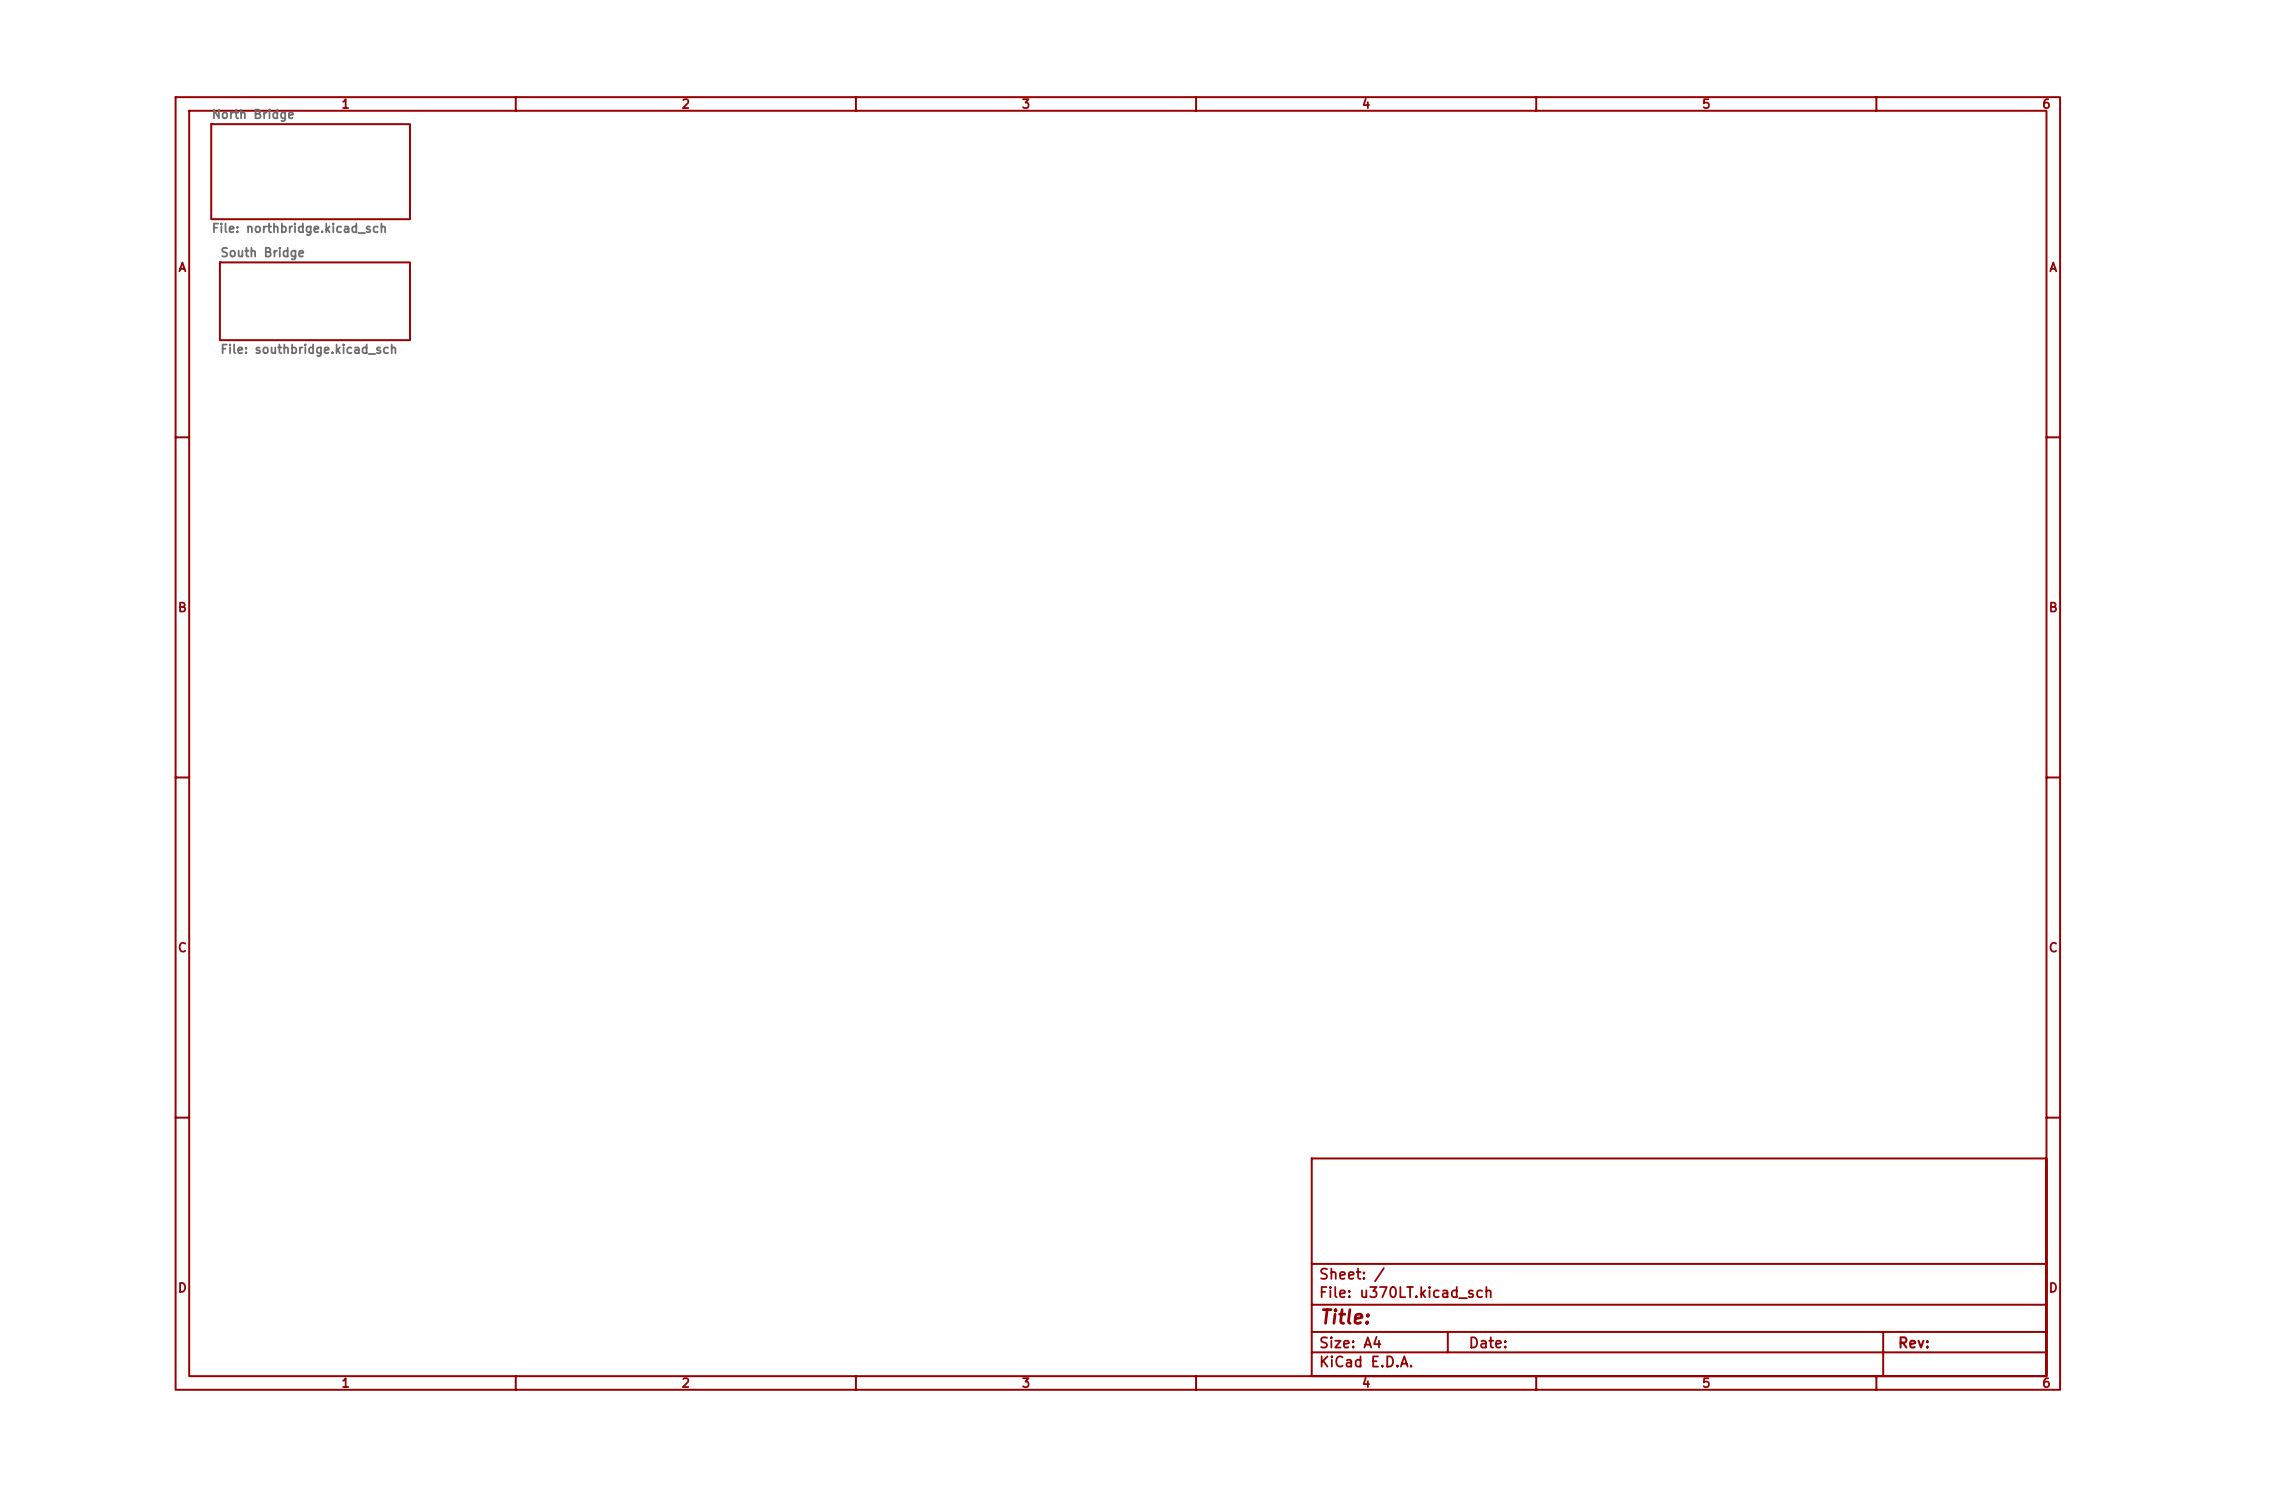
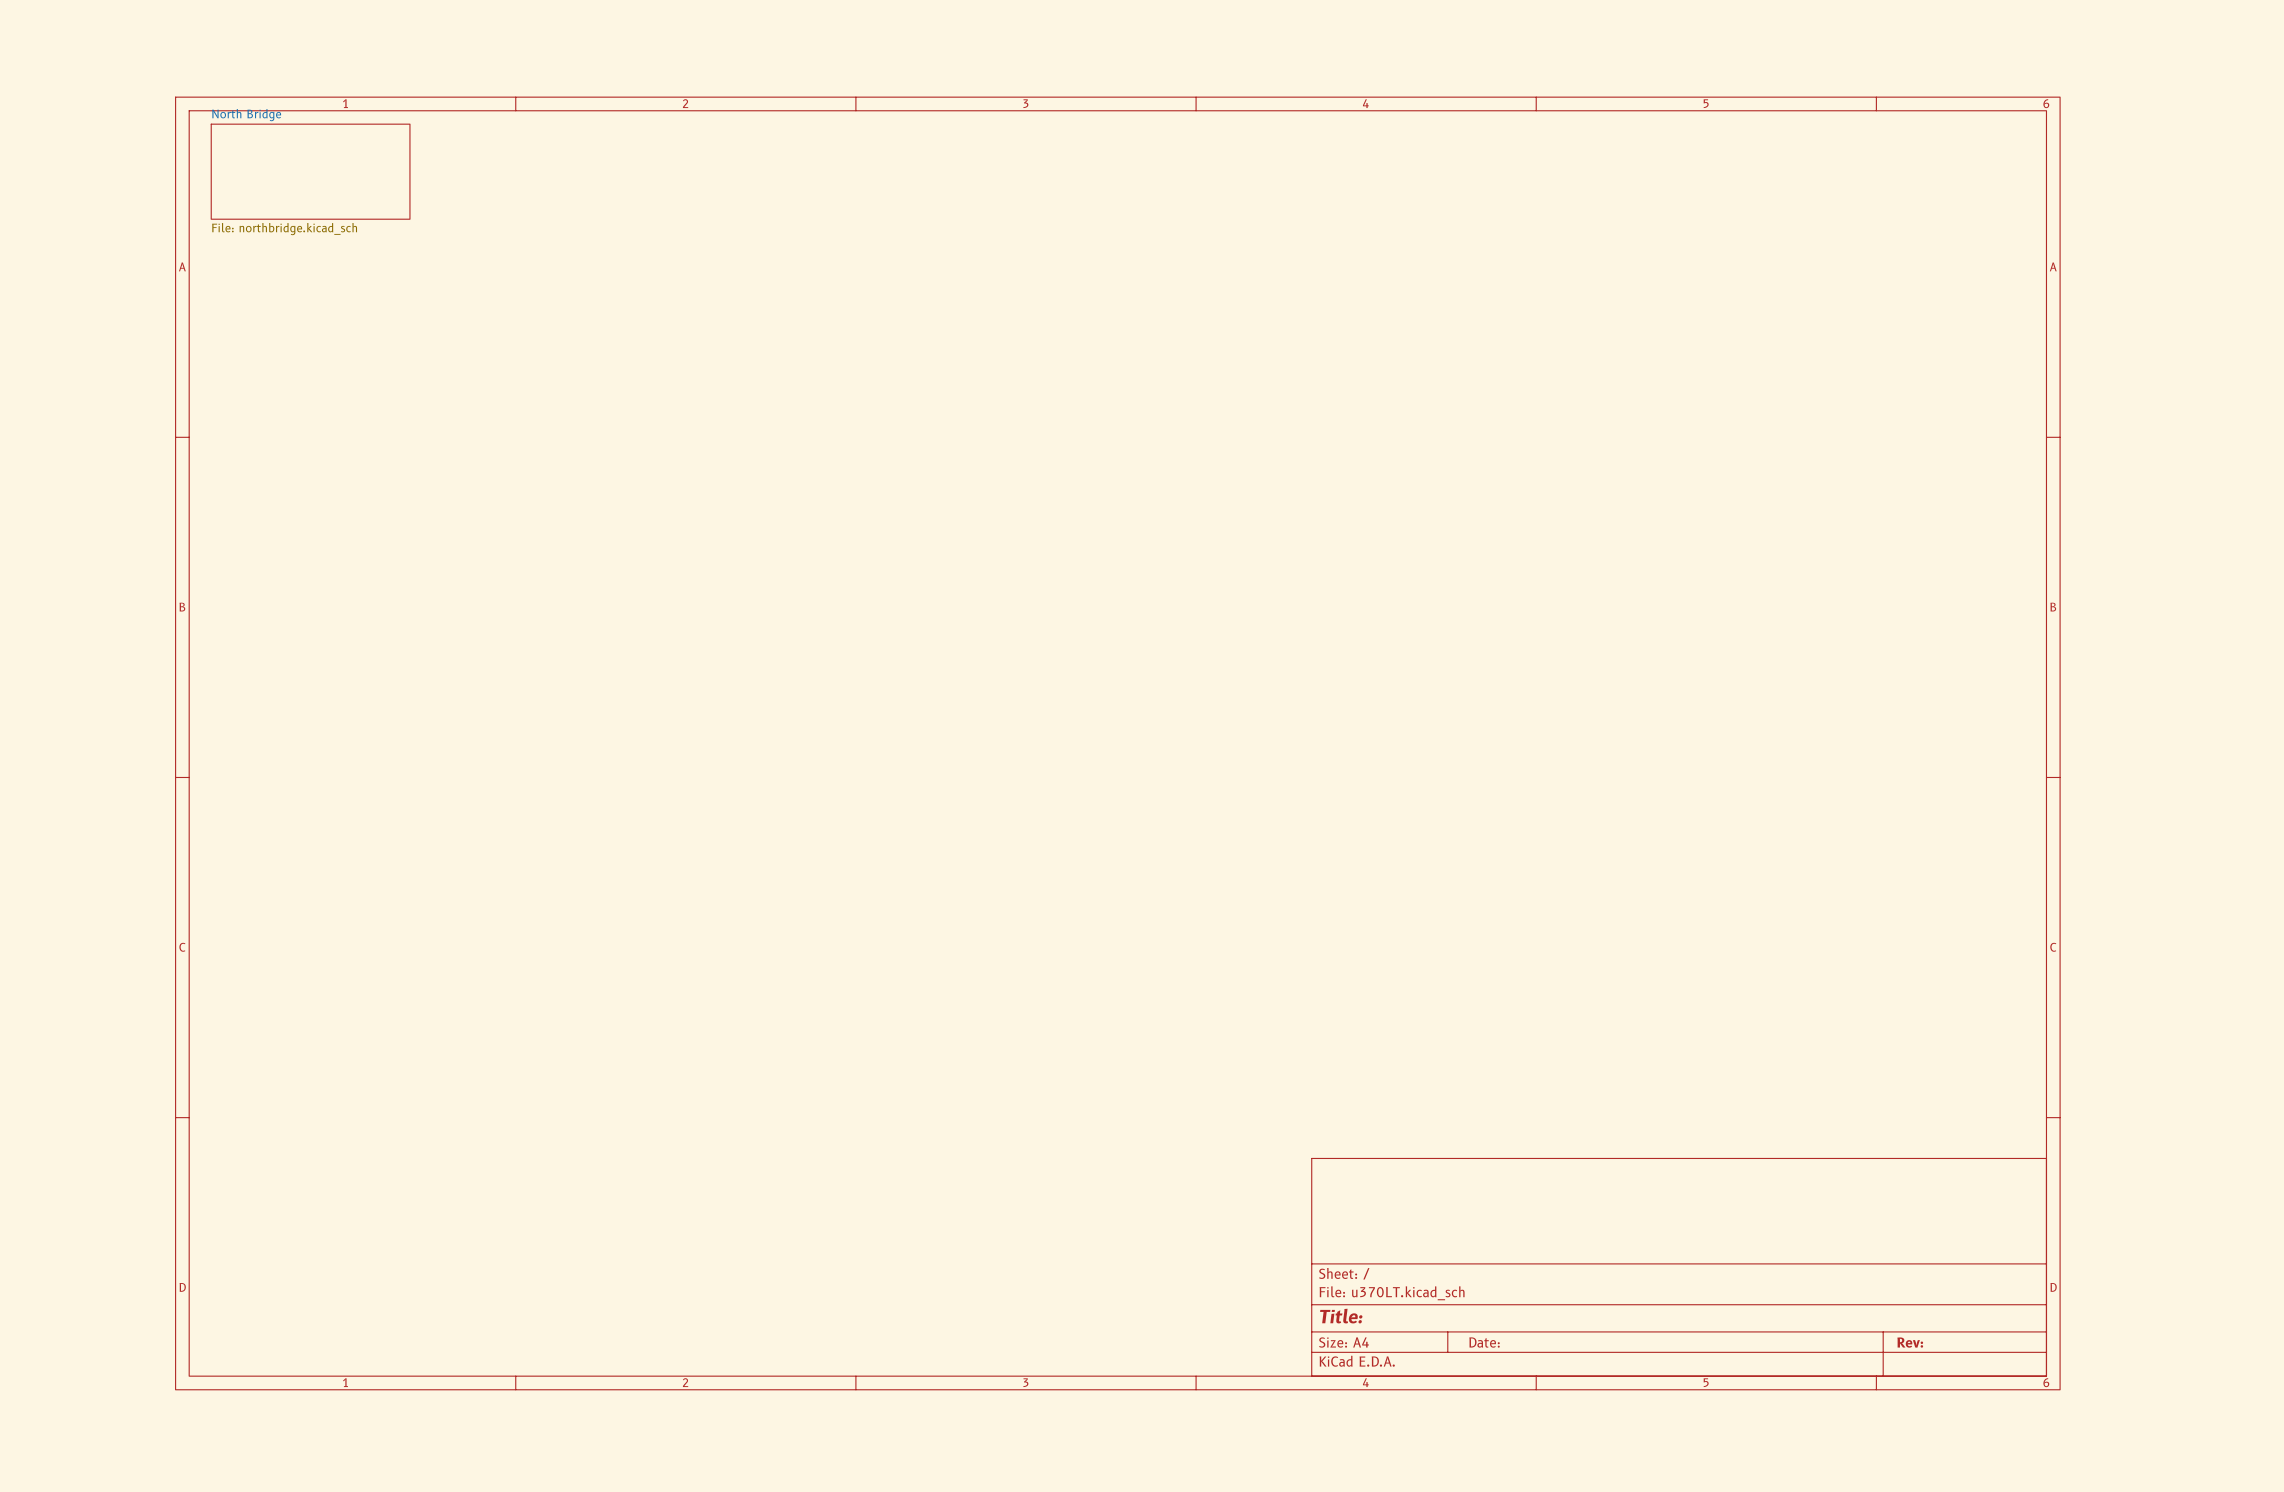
sheet South Bridge: File: southbridge.kicad_sch (314, 301) -> none

